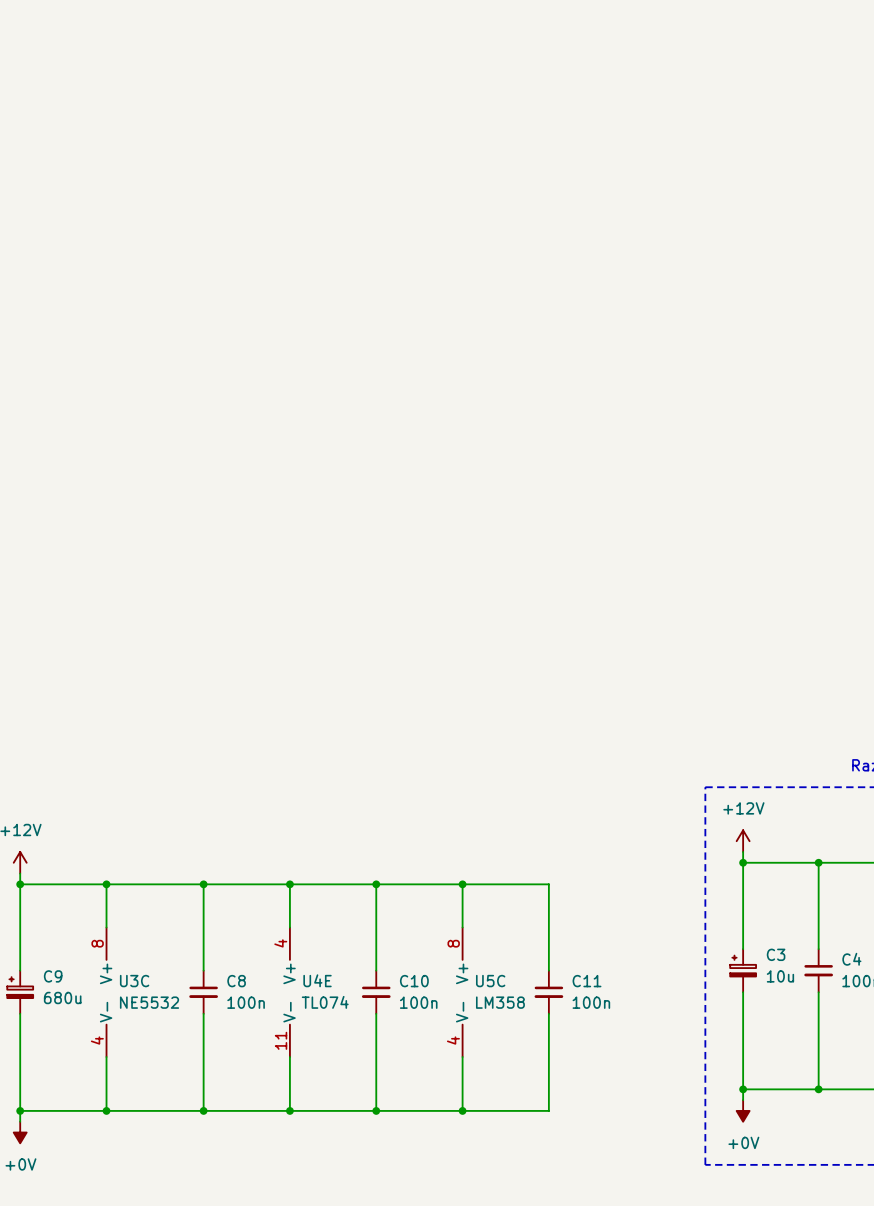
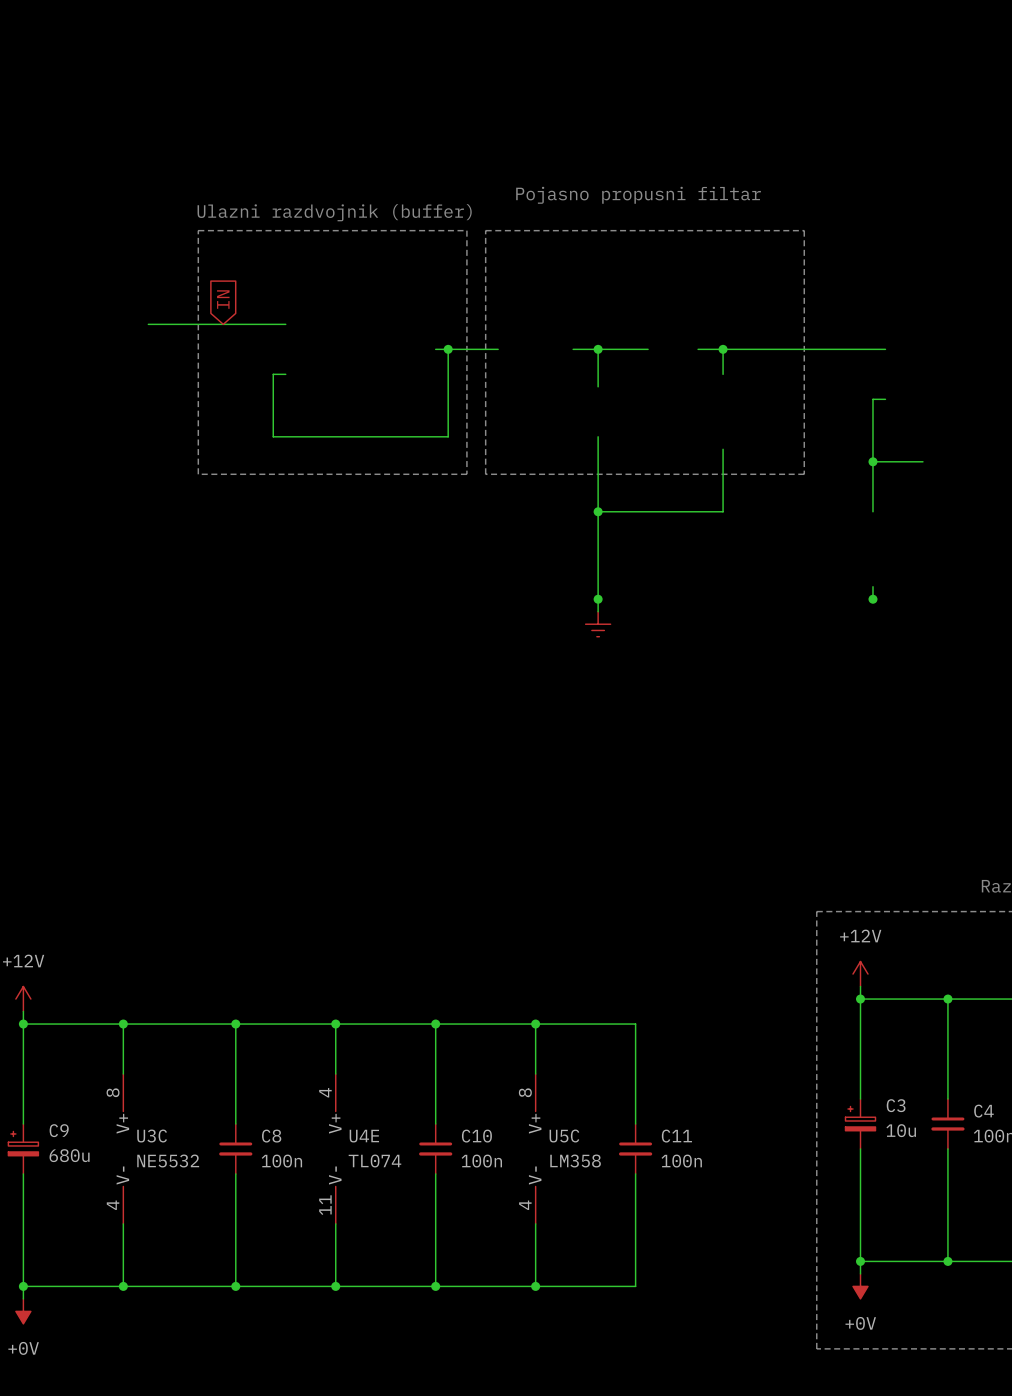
text: none -> Pojasno propusni filtar (638, 195)
text: none -> Ulazni razdvojnik (buffer) (334, 212)
line: none -> (198, 230) (466, 230) (466, 474) (198, 474) (198, 230)
line: none -> (485, 230) (804, 230) (804, 474) (485, 474) (485, 230)
global label: none -> IN (223, 299)
wire: none -> (148, 324) (285, 324)
wire: none -> (435, 349) (498, 349)
wire: none -> (448, 349) (448, 436) (273, 436) (273, 374) (285, 374)
junction: none -> (448, 349)
wire: none -> (573, 349) (648, 349)
wire: none -> (598, 349) (598, 386)
junction: none -> (598, 349)
wire: none -> (698, 349) (885, 349)
wire: none -> (723, 349) (723, 374)
junction: none -> (723, 349)
wire: none -> (885, 399) (872, 399) (872, 511)
wire: none -> (598, 436) (598, 611)
wire: none -> (723, 449) (723, 511) (598, 511)
wire: none -> (872, 461) (922, 461)
junction: none -> (872, 461)
junction: none -> (598, 511)
wire: none -> (872, 586) (872, 599)
junction: none -> (598, 599)
junction: none -> (872, 599)
power symbol: none -> (598, 624)

